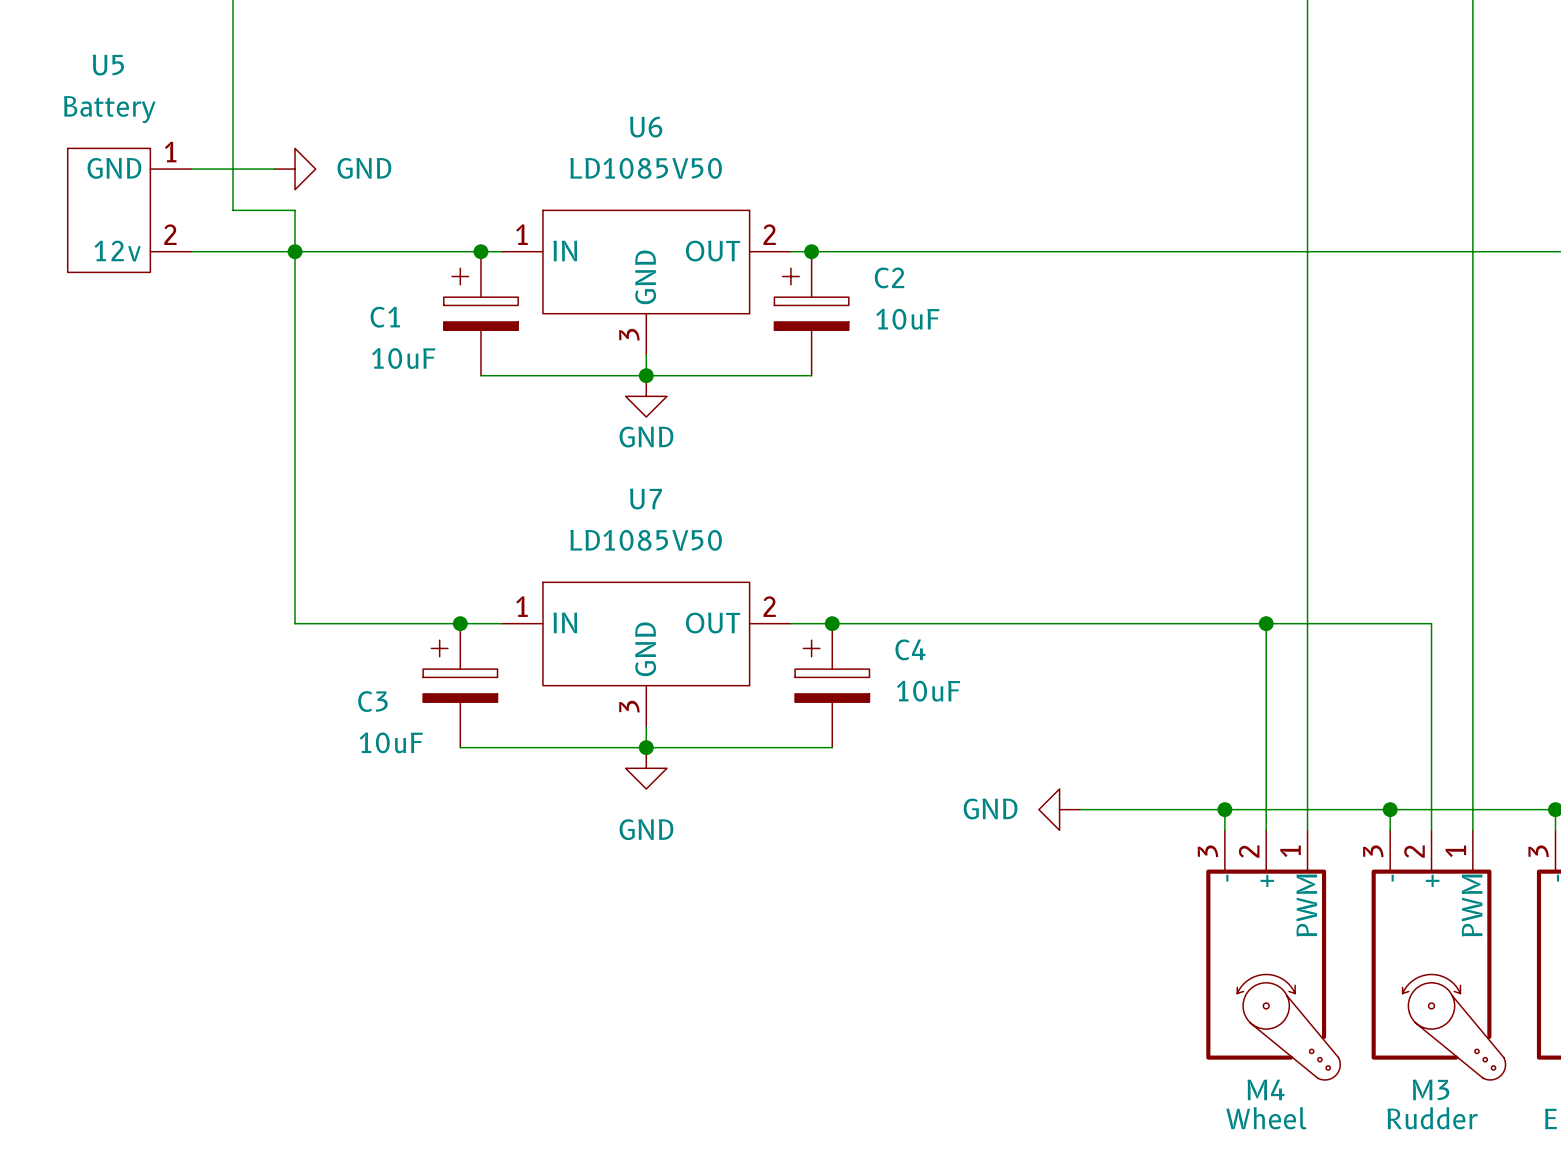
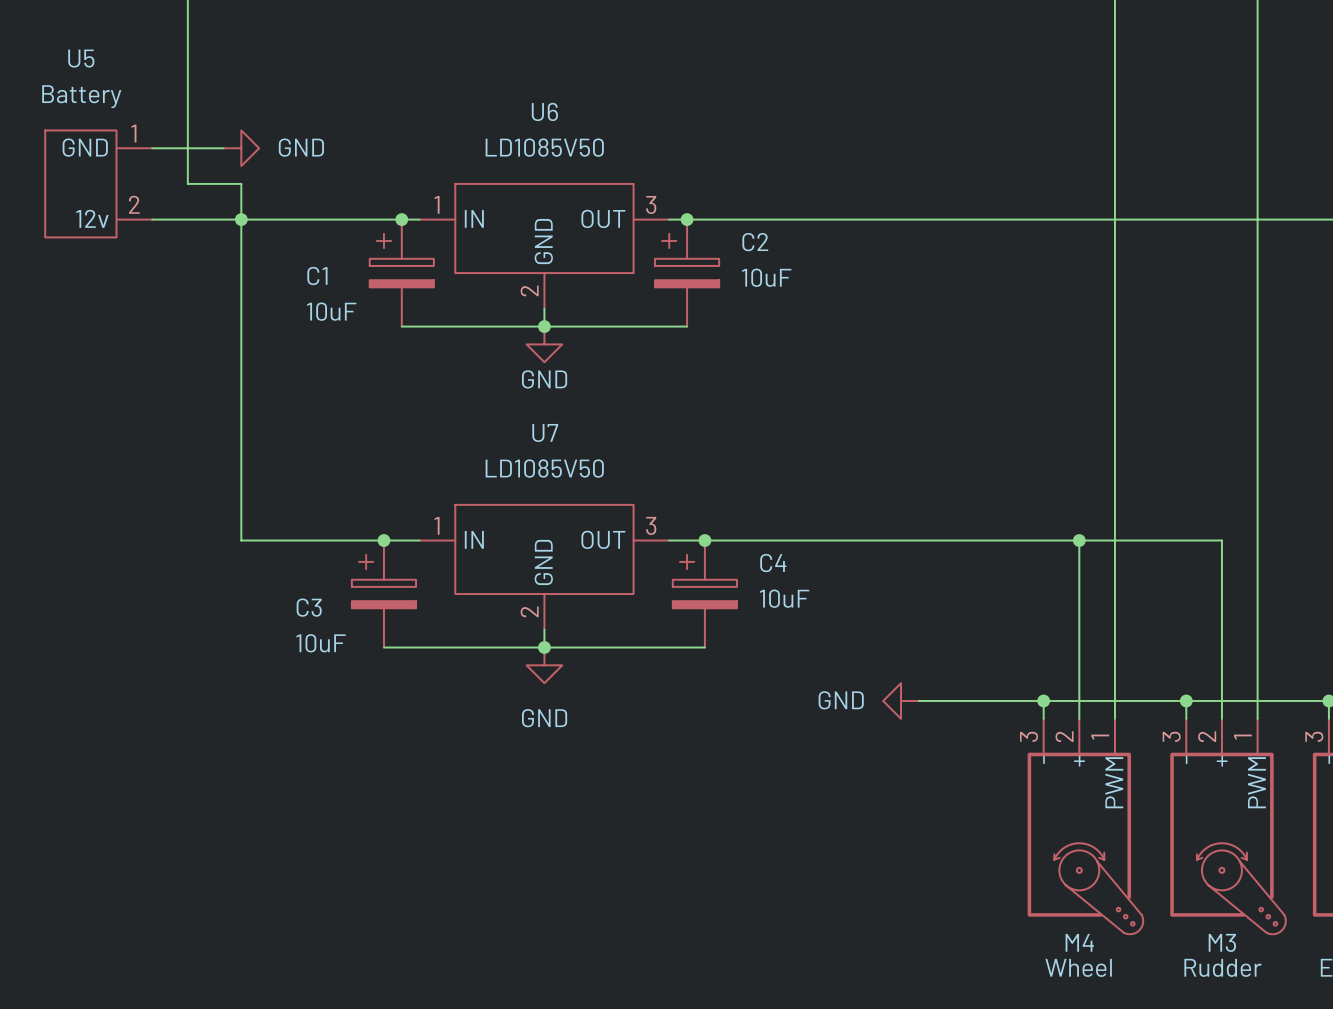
U6 pin number: 2 (769, 234) -> 3 (651, 204)
U6 pin number: 3 (629, 334) -> 2 (529, 290)
U7 pin number: 2 (769, 606) -> 3 (651, 525)
U7 pin number: 3 (629, 706) -> 2 (529, 611)

